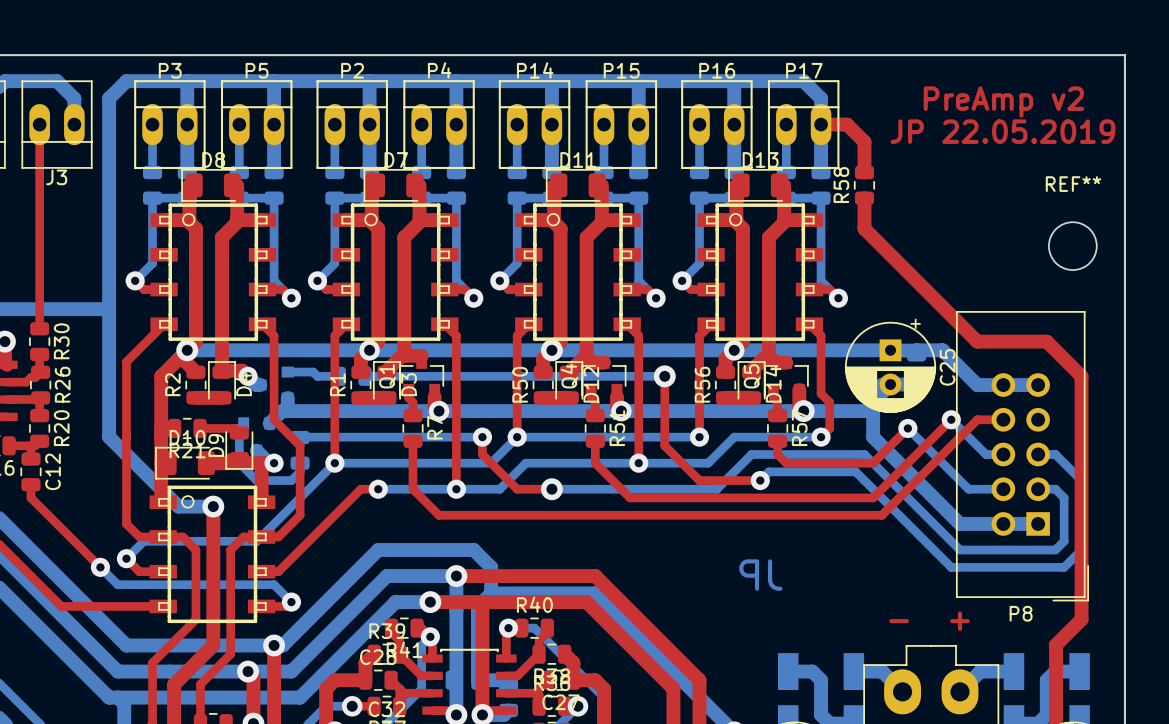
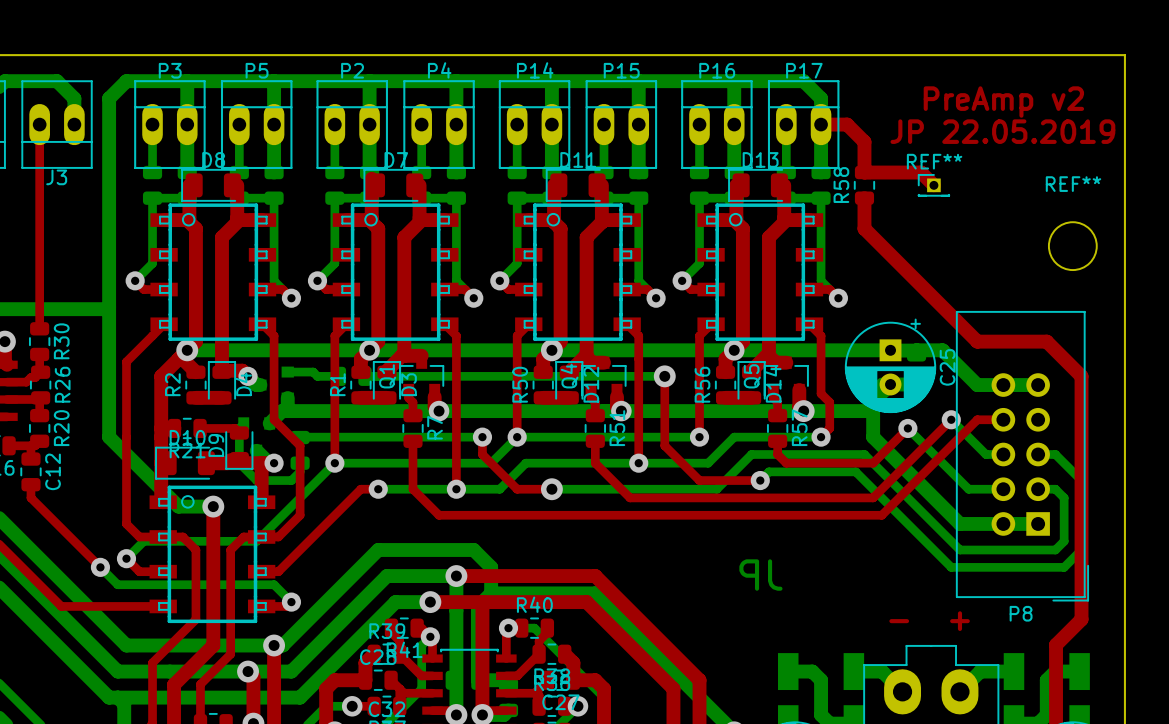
top track: none -> (864, 172) (921, 172) (933, 185)
REF**: none -> (933, 185)

